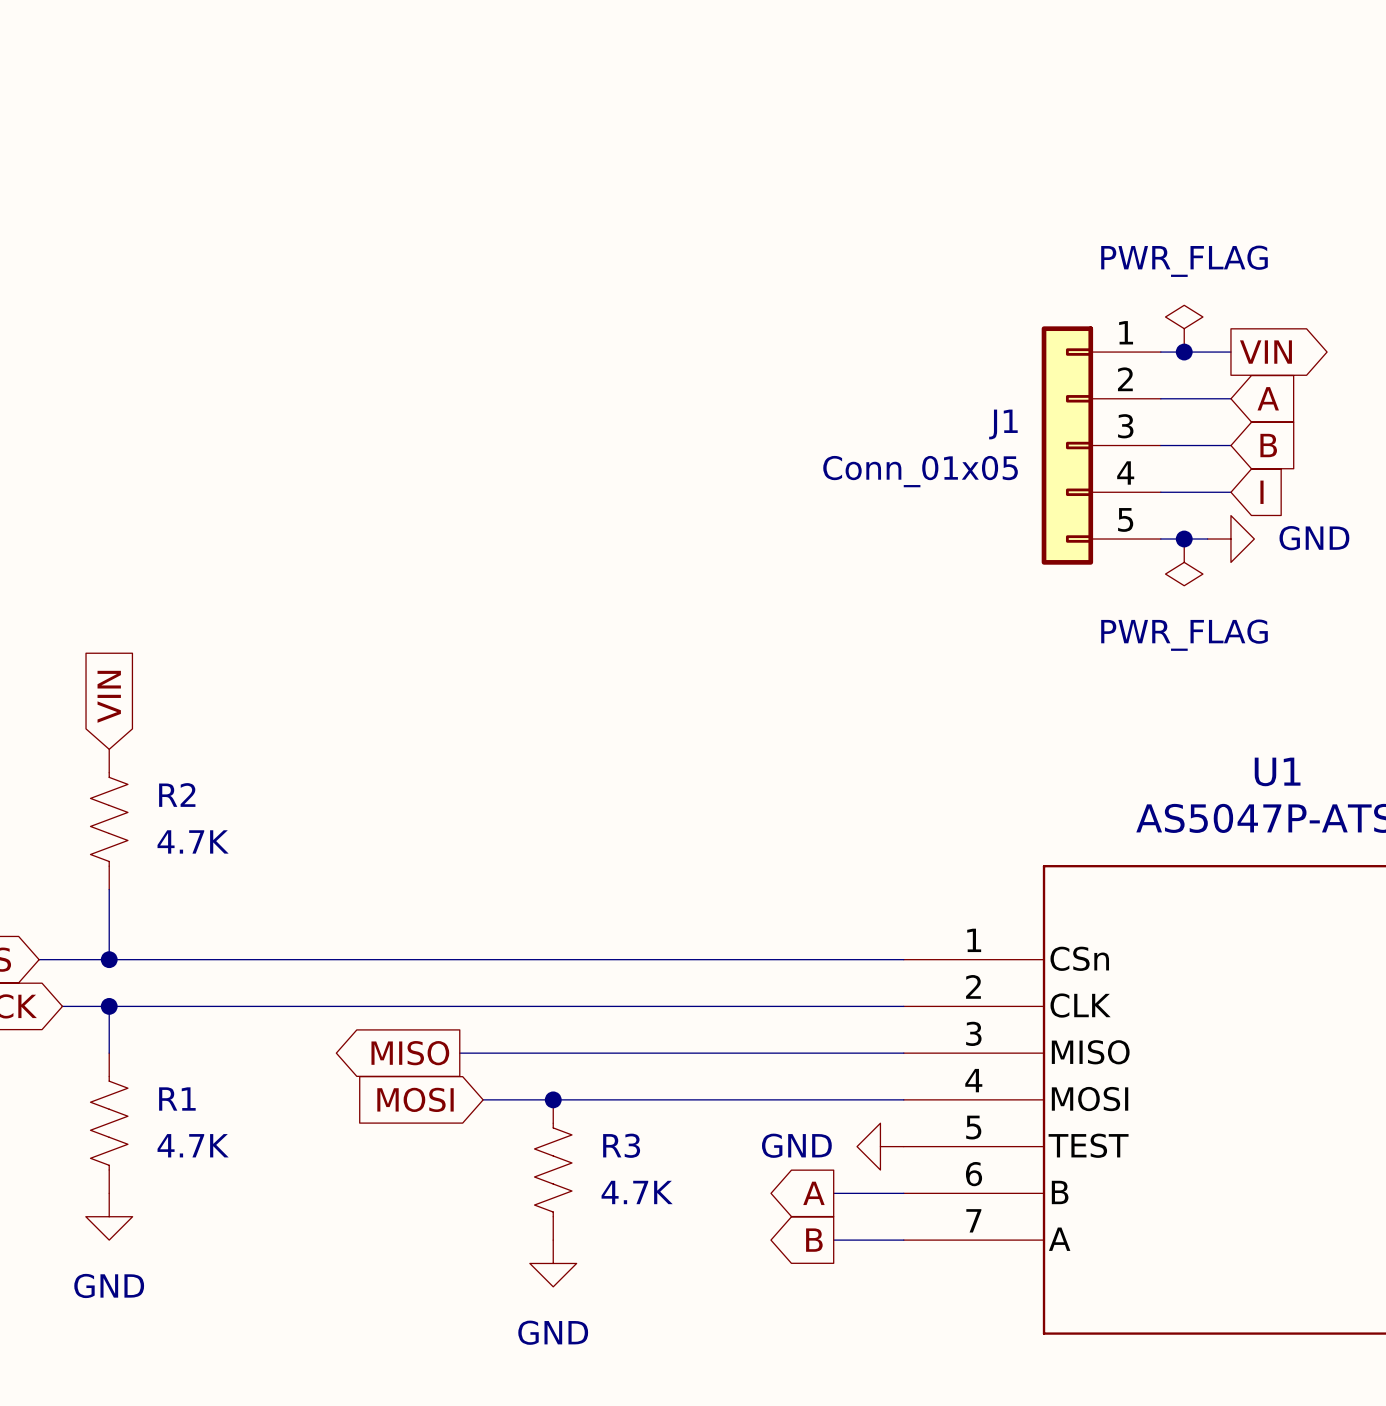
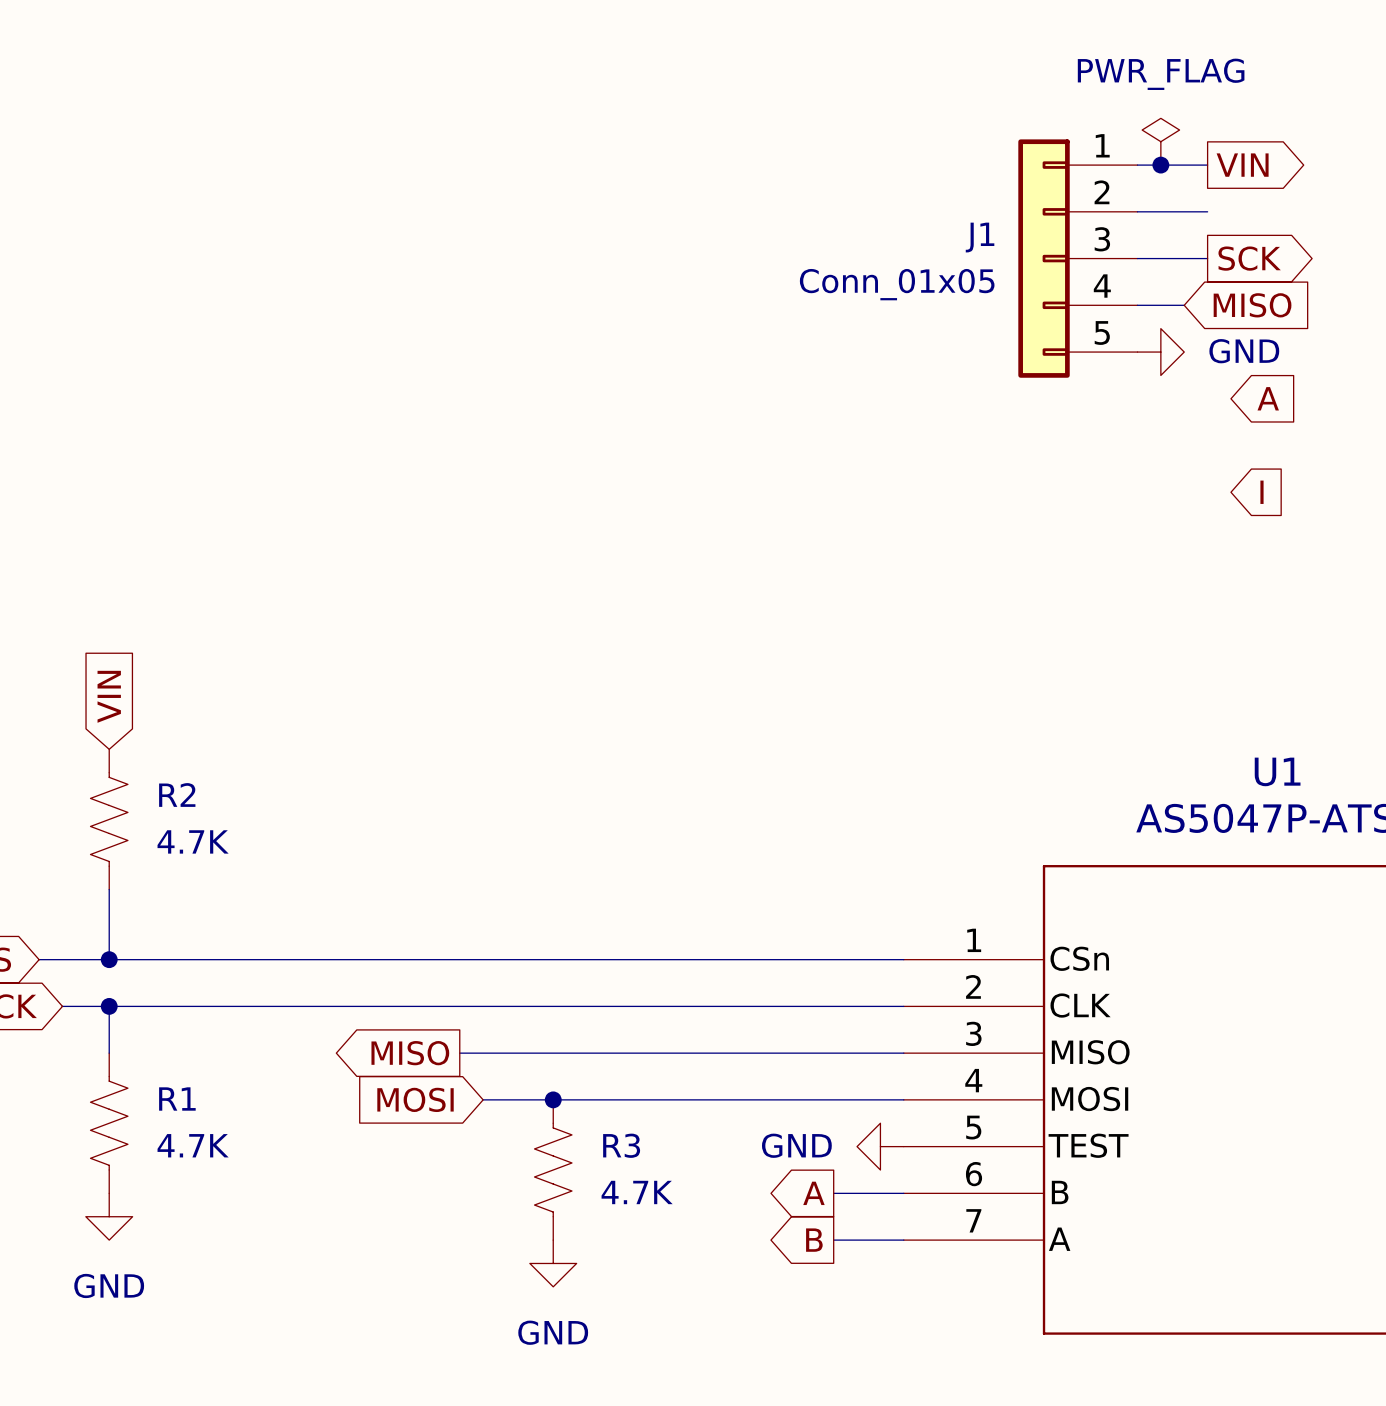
junction: none -> (1160, 165)
global label: none -> SCK (1249, 258)
global label: none -> MISO (1252, 305)
power symbol position: PWR_FLAG (1184, 328) -> PWR_FLAG (1160, 141)
wire: (1160, 352) (1230, 352) -> none
junction: (1184, 352) -> none
global label position: VIN (1265, 352) -> VIN (1242, 165)
wire: (1160, 398) (1230, 398) -> (1137, 165) (1207, 165)
J1 position: (1101, 445) -> (1077, 258)
wire: (1160, 445) (1230, 445) -> (1137, 211) (1207, 211)
global label: B (1268, 445) -> none
wire: (1160, 492) (1230, 492) -> (1137, 258) (1207, 258)
wire: (1160, 539) (1207, 539) -> (1137, 305) (1184, 305)
junction: (1184, 539) -> none
power symbol position: GND (1230, 539) -> GND (1160, 352)
power symbol: PWR_FLAG (1184, 562) -> none

